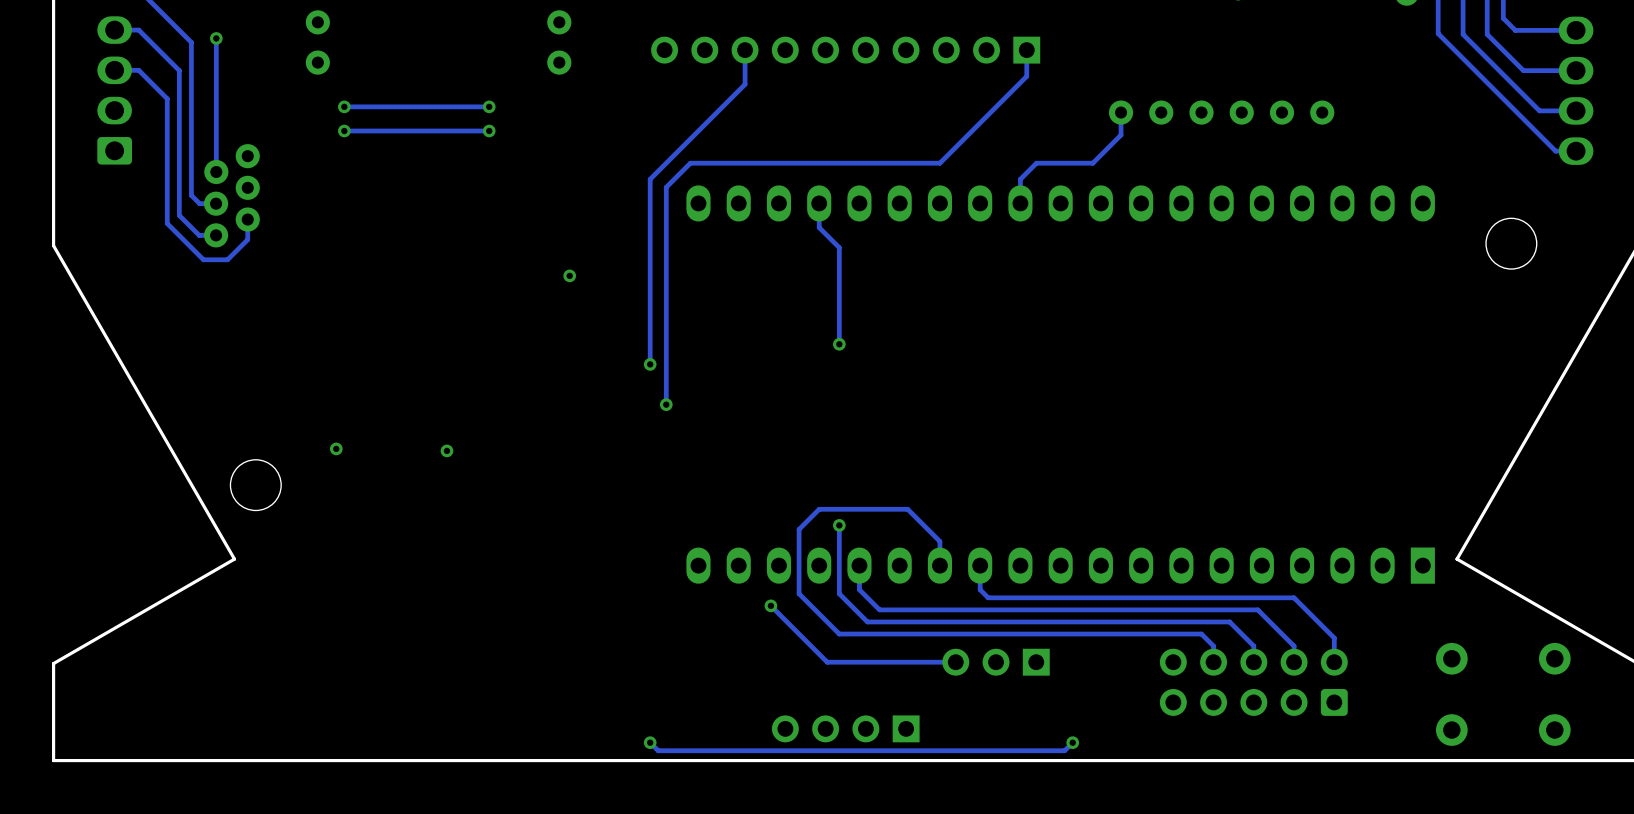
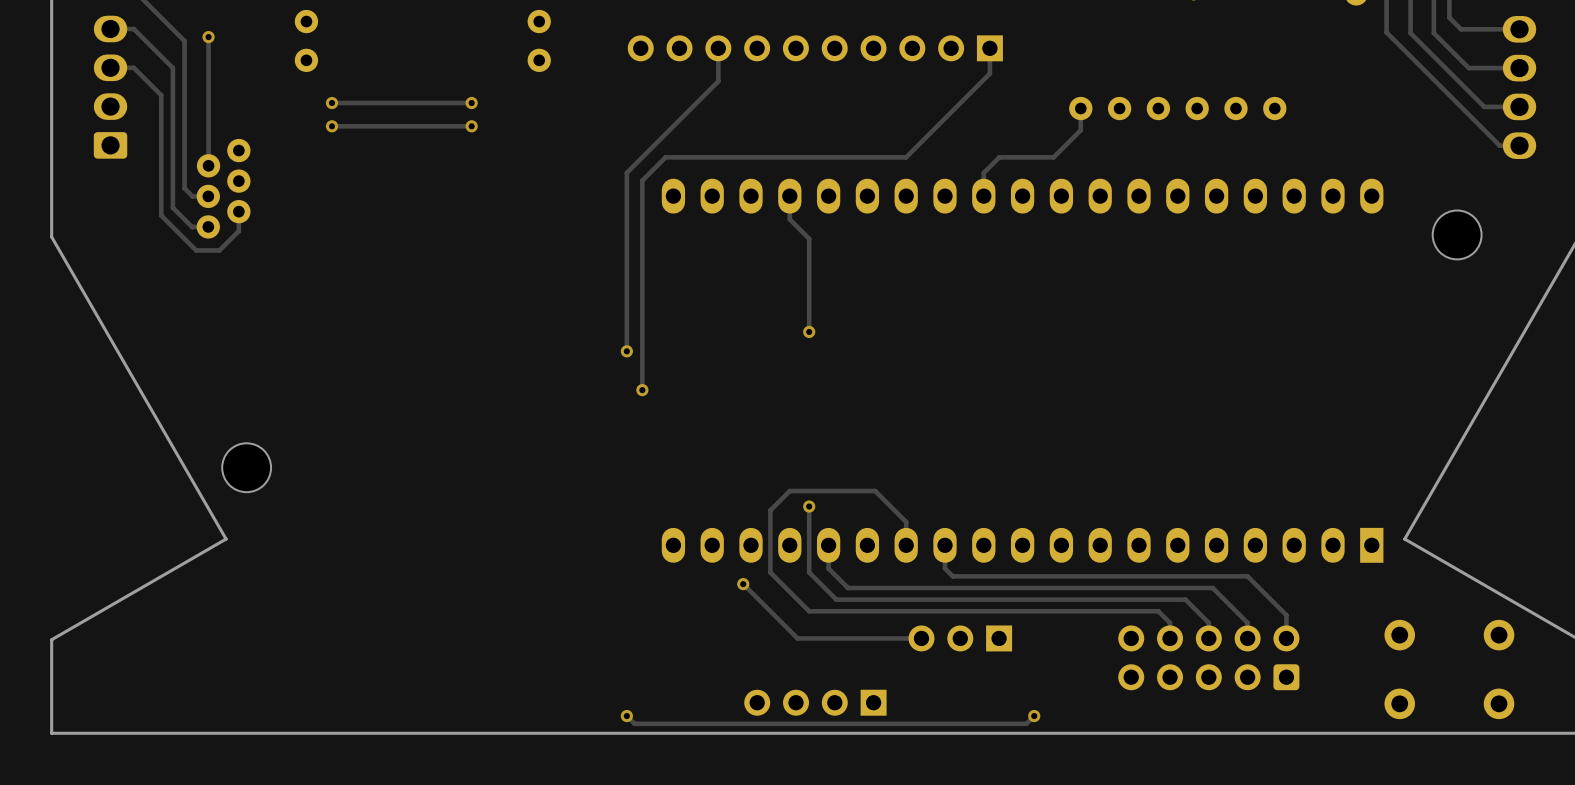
via: (569, 275) -> none
via: (336, 448) -> none
via: (446, 450) -> none

